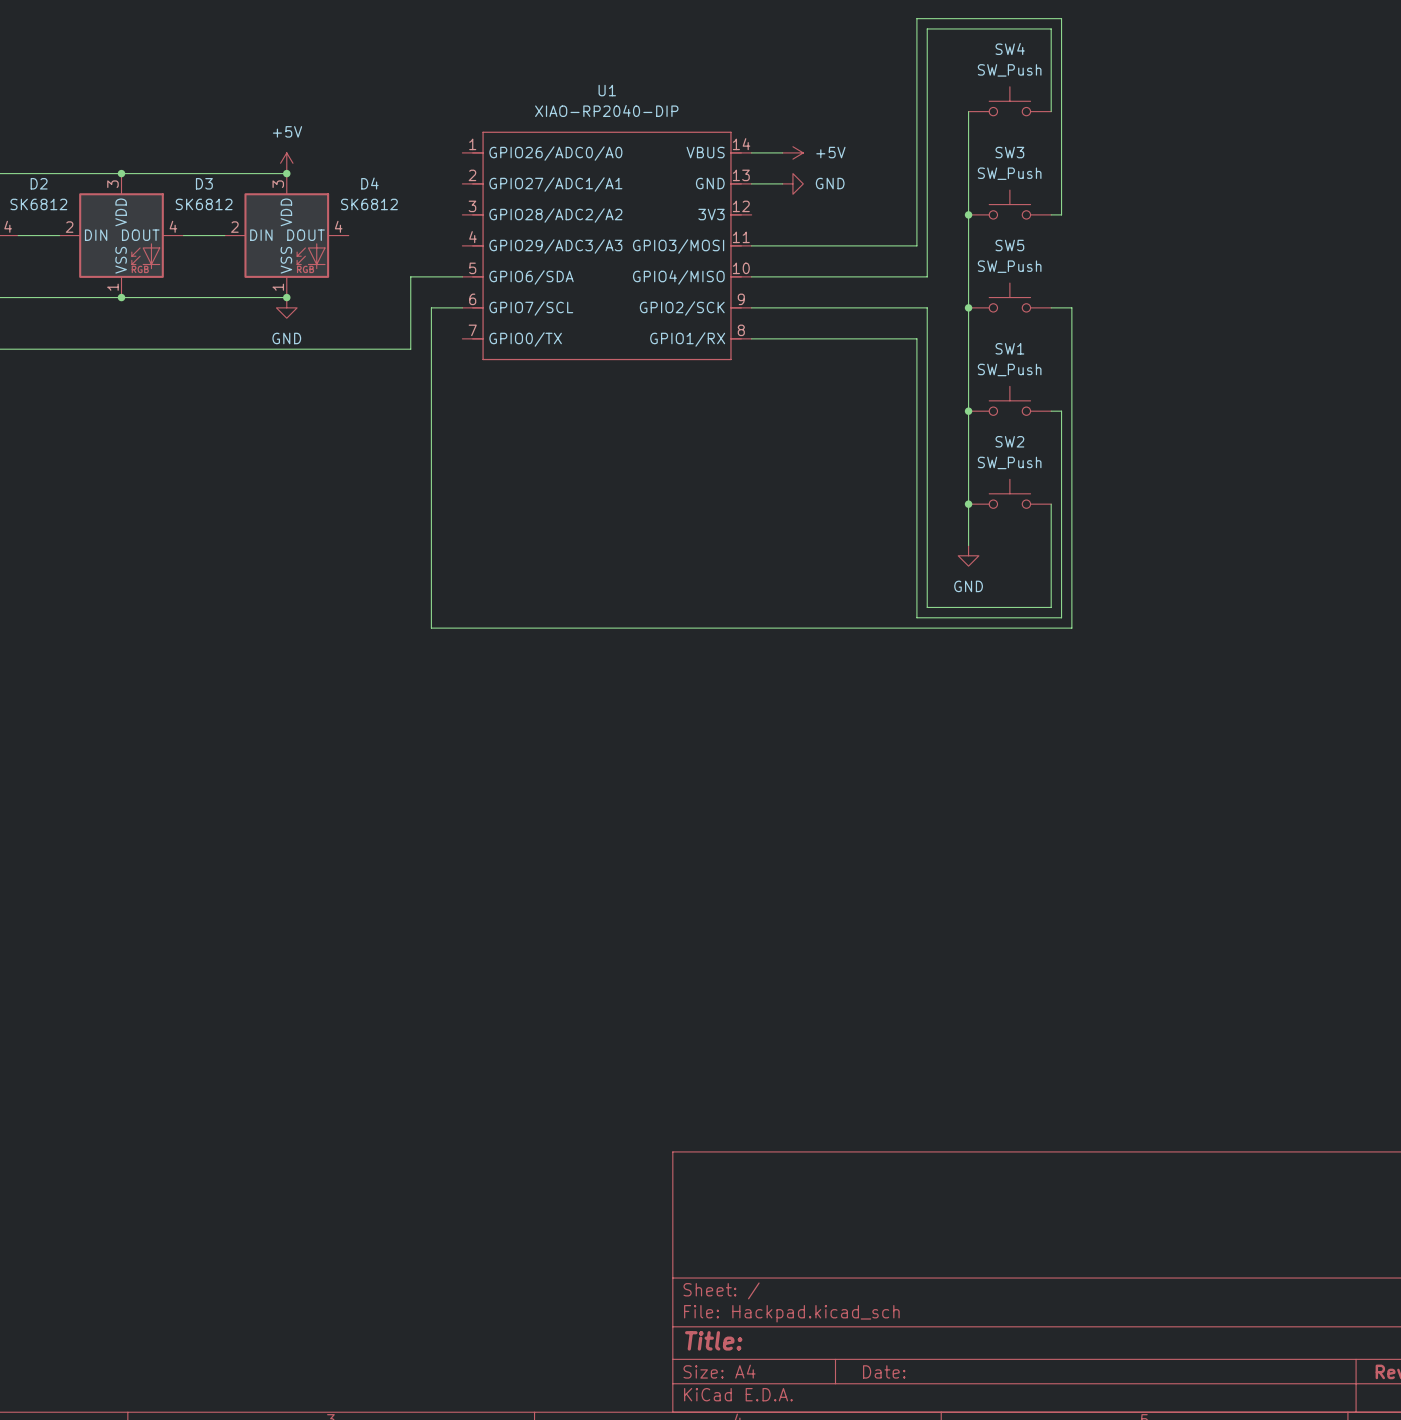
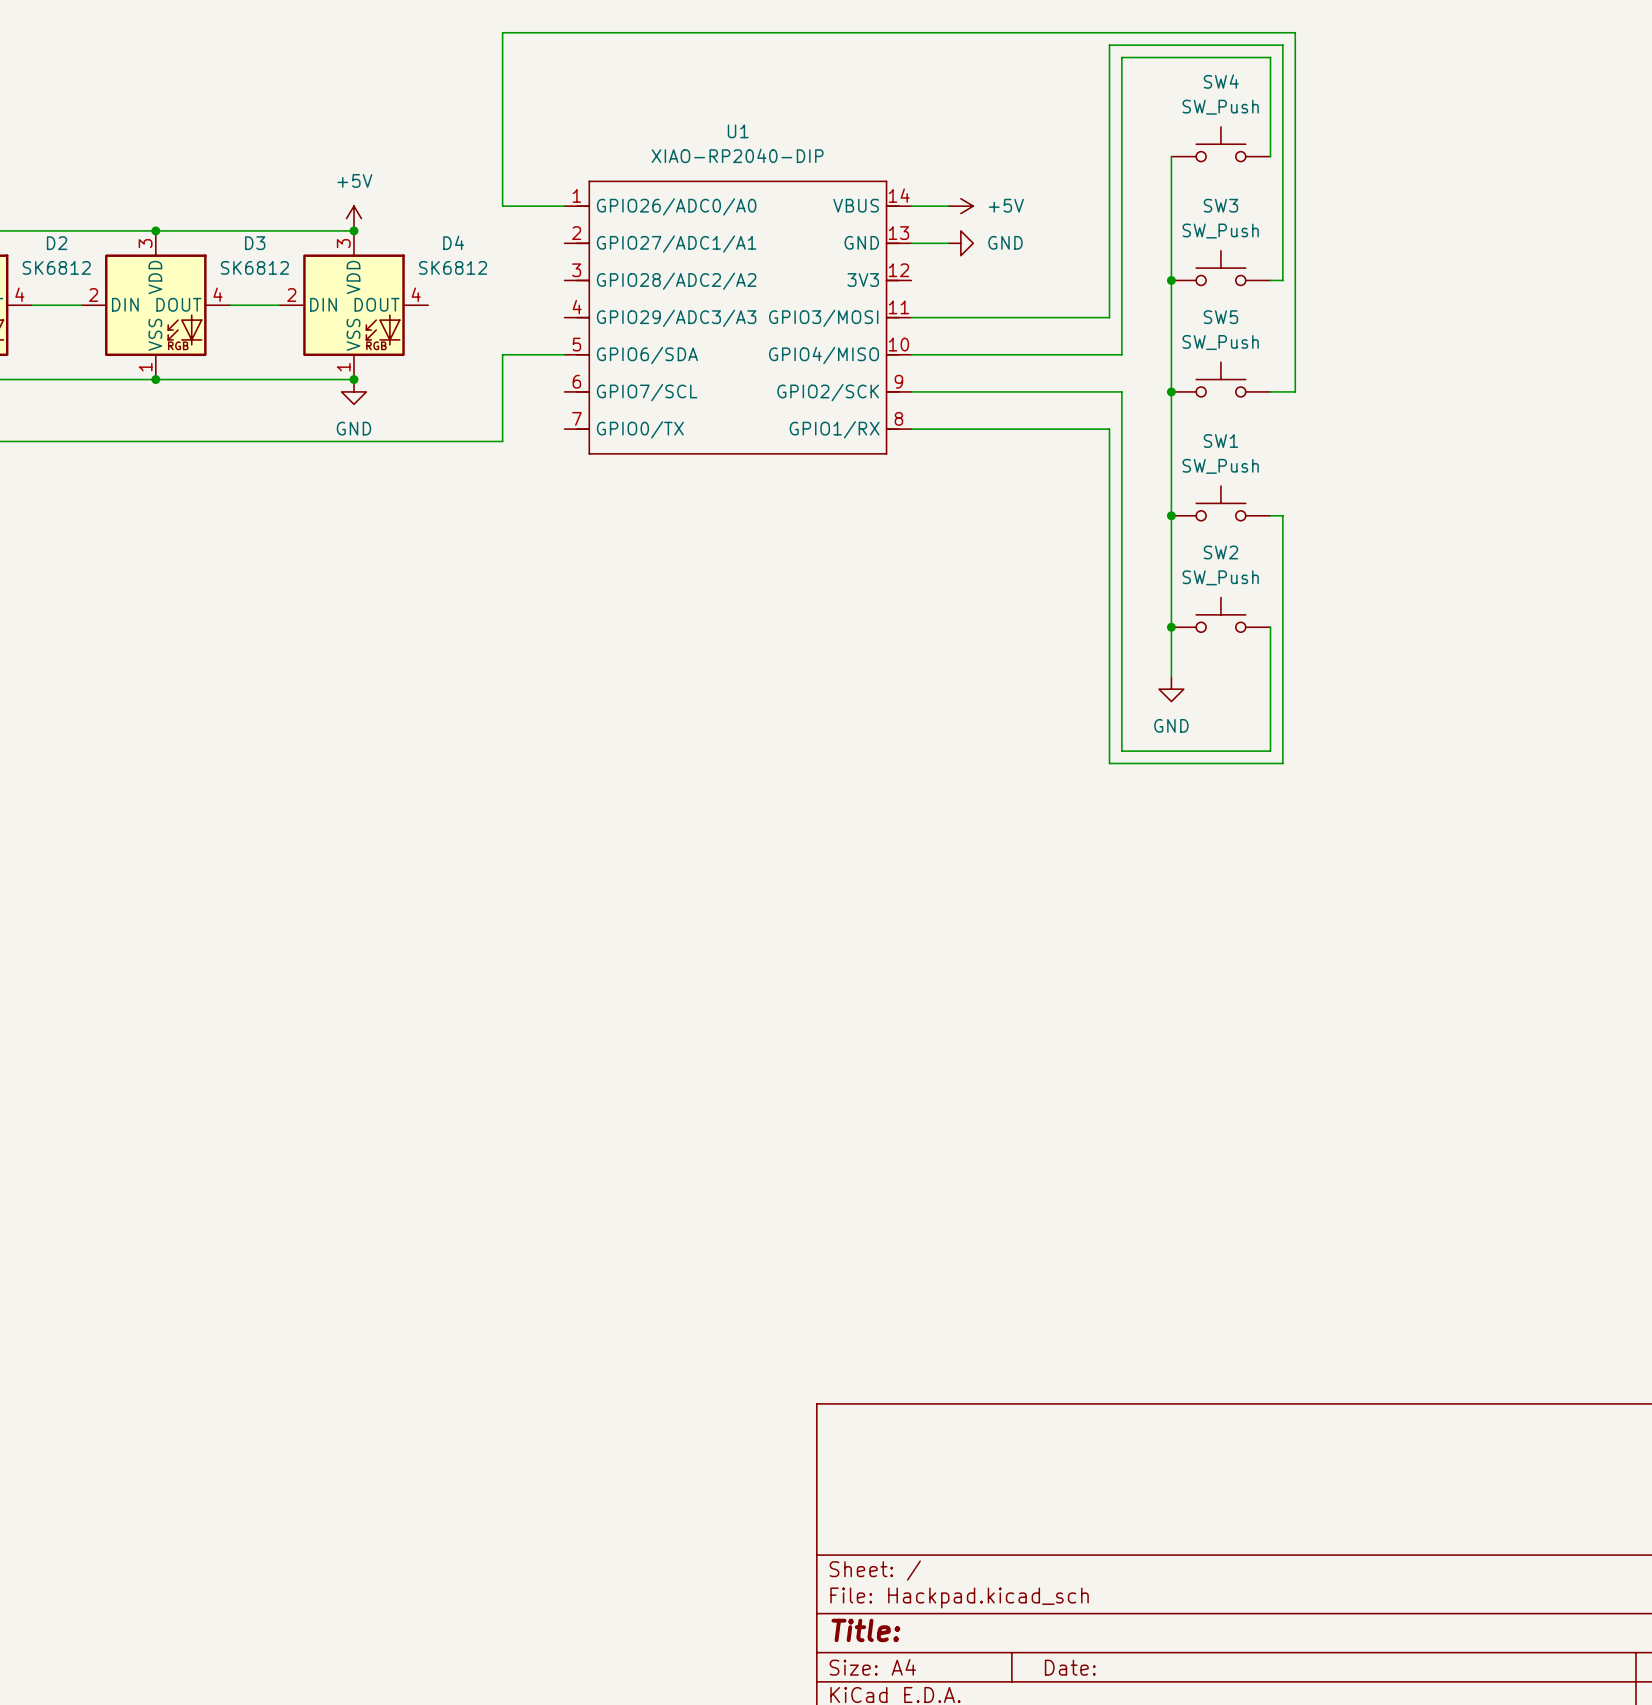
wire: (462, 307) (431, 307) (431, 628) (1071, 628) (1071, 307) -> (564, 206) (502, 206) (502, 32) (1295, 32) (1295, 391)

